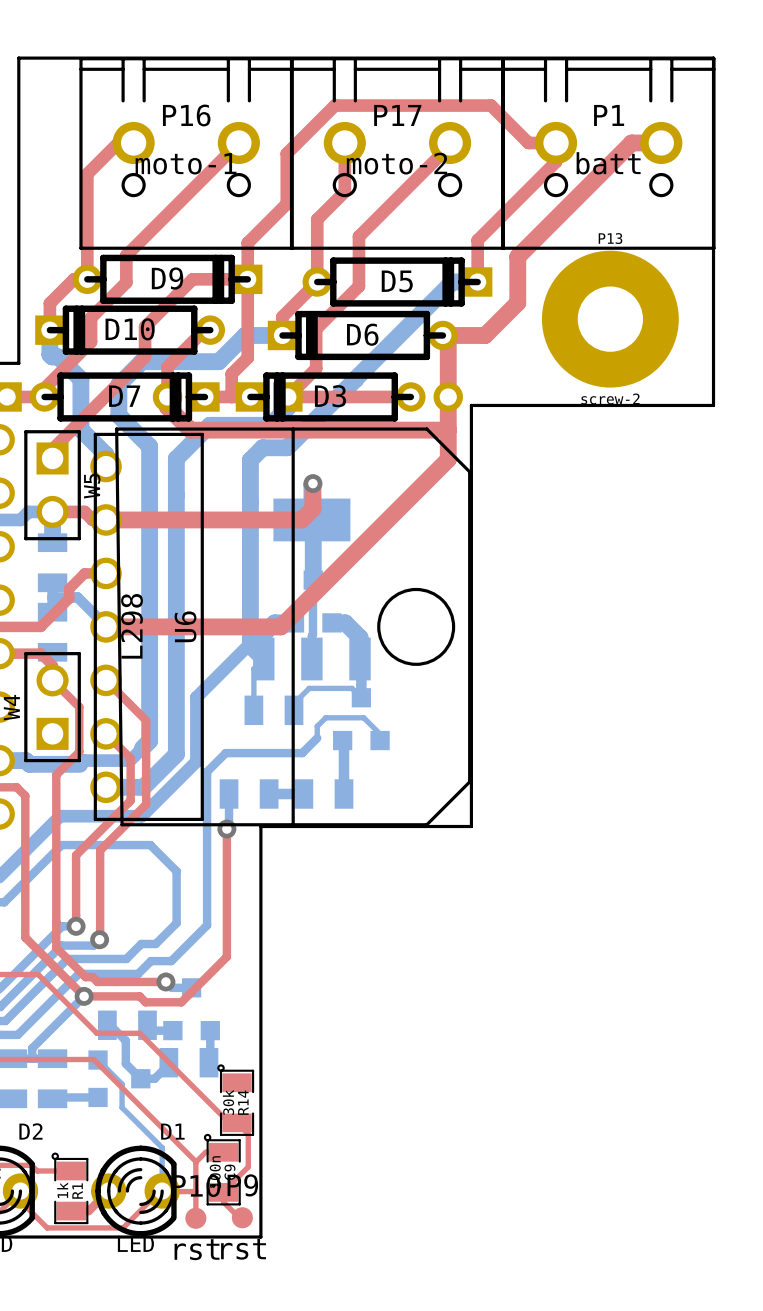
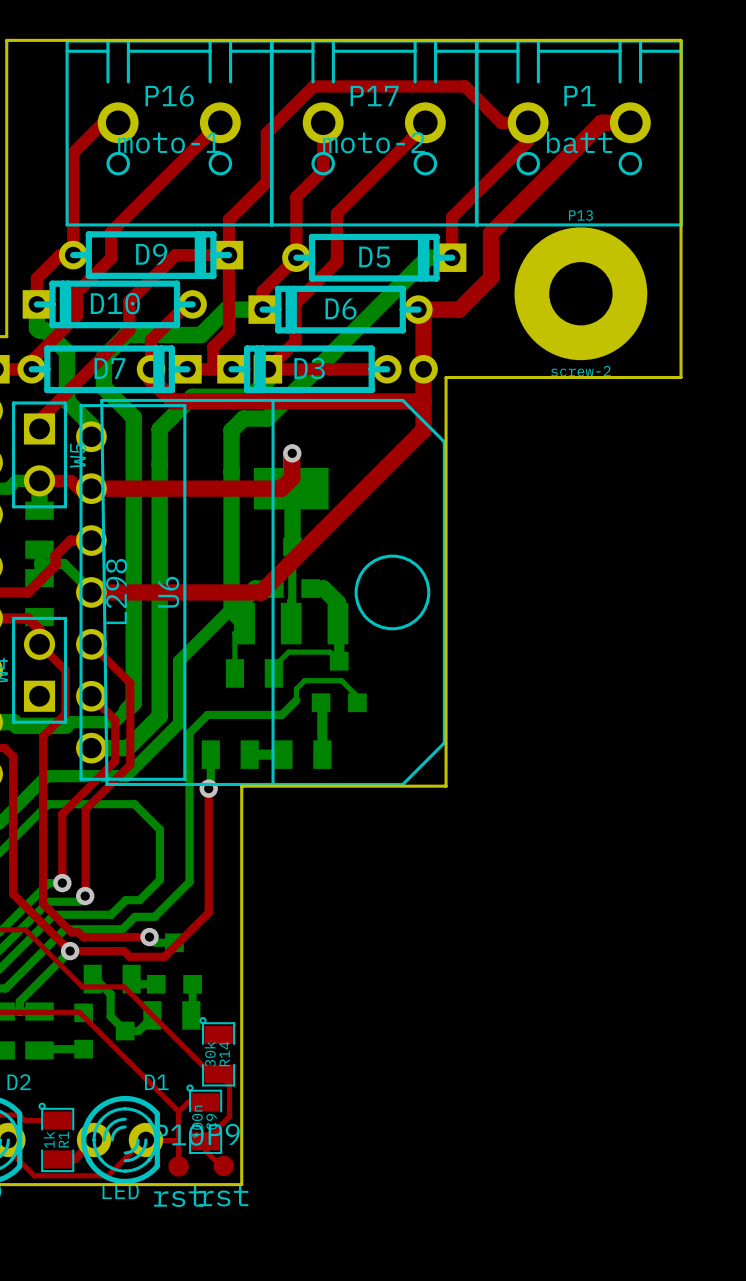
bottom track: (98, 1060) (122, 1084) (122, 1107) (162, 1147) (162, 1191) -> none

